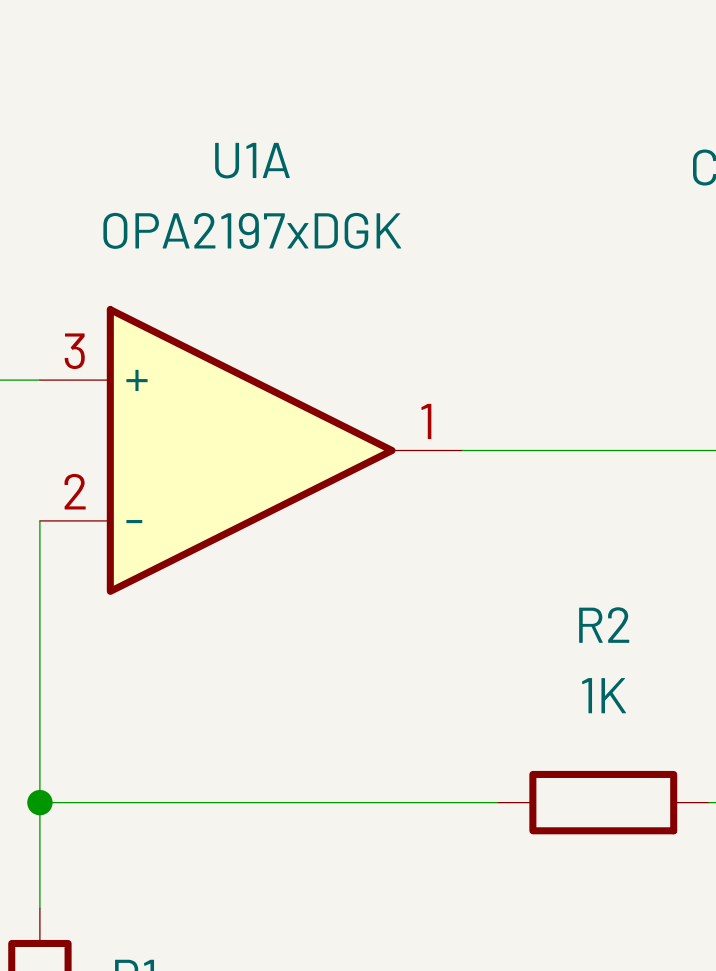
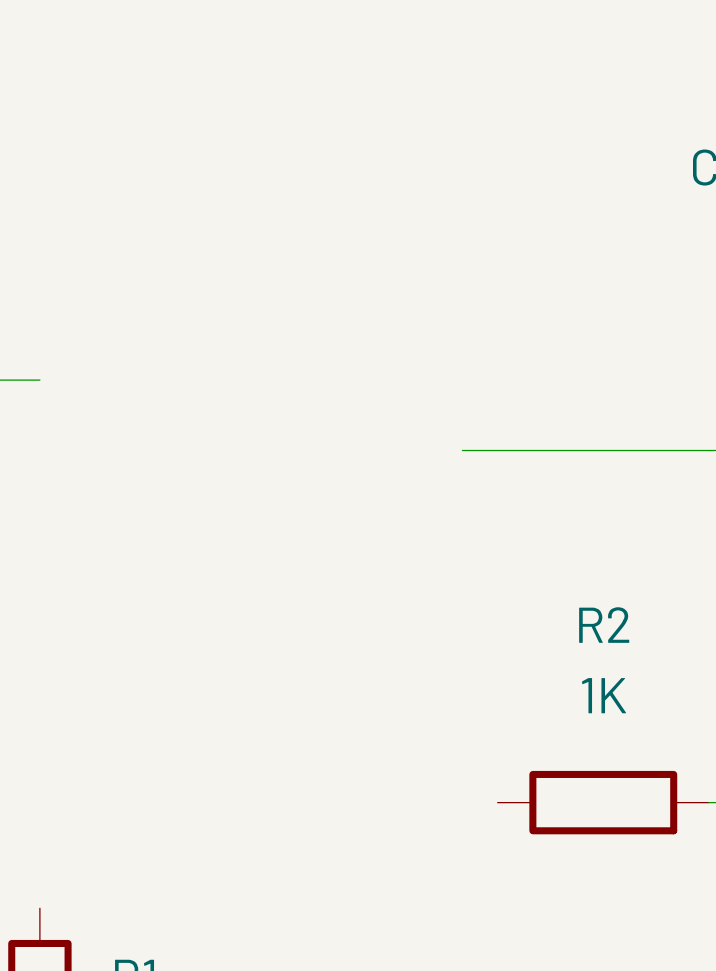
U1A: OPA2197xDGK (251, 450) -> none
wire: (39, 520) (39, 908) -> none
wire: (39, 802) (497, 802) -> none
junction: (39, 802) -> none

